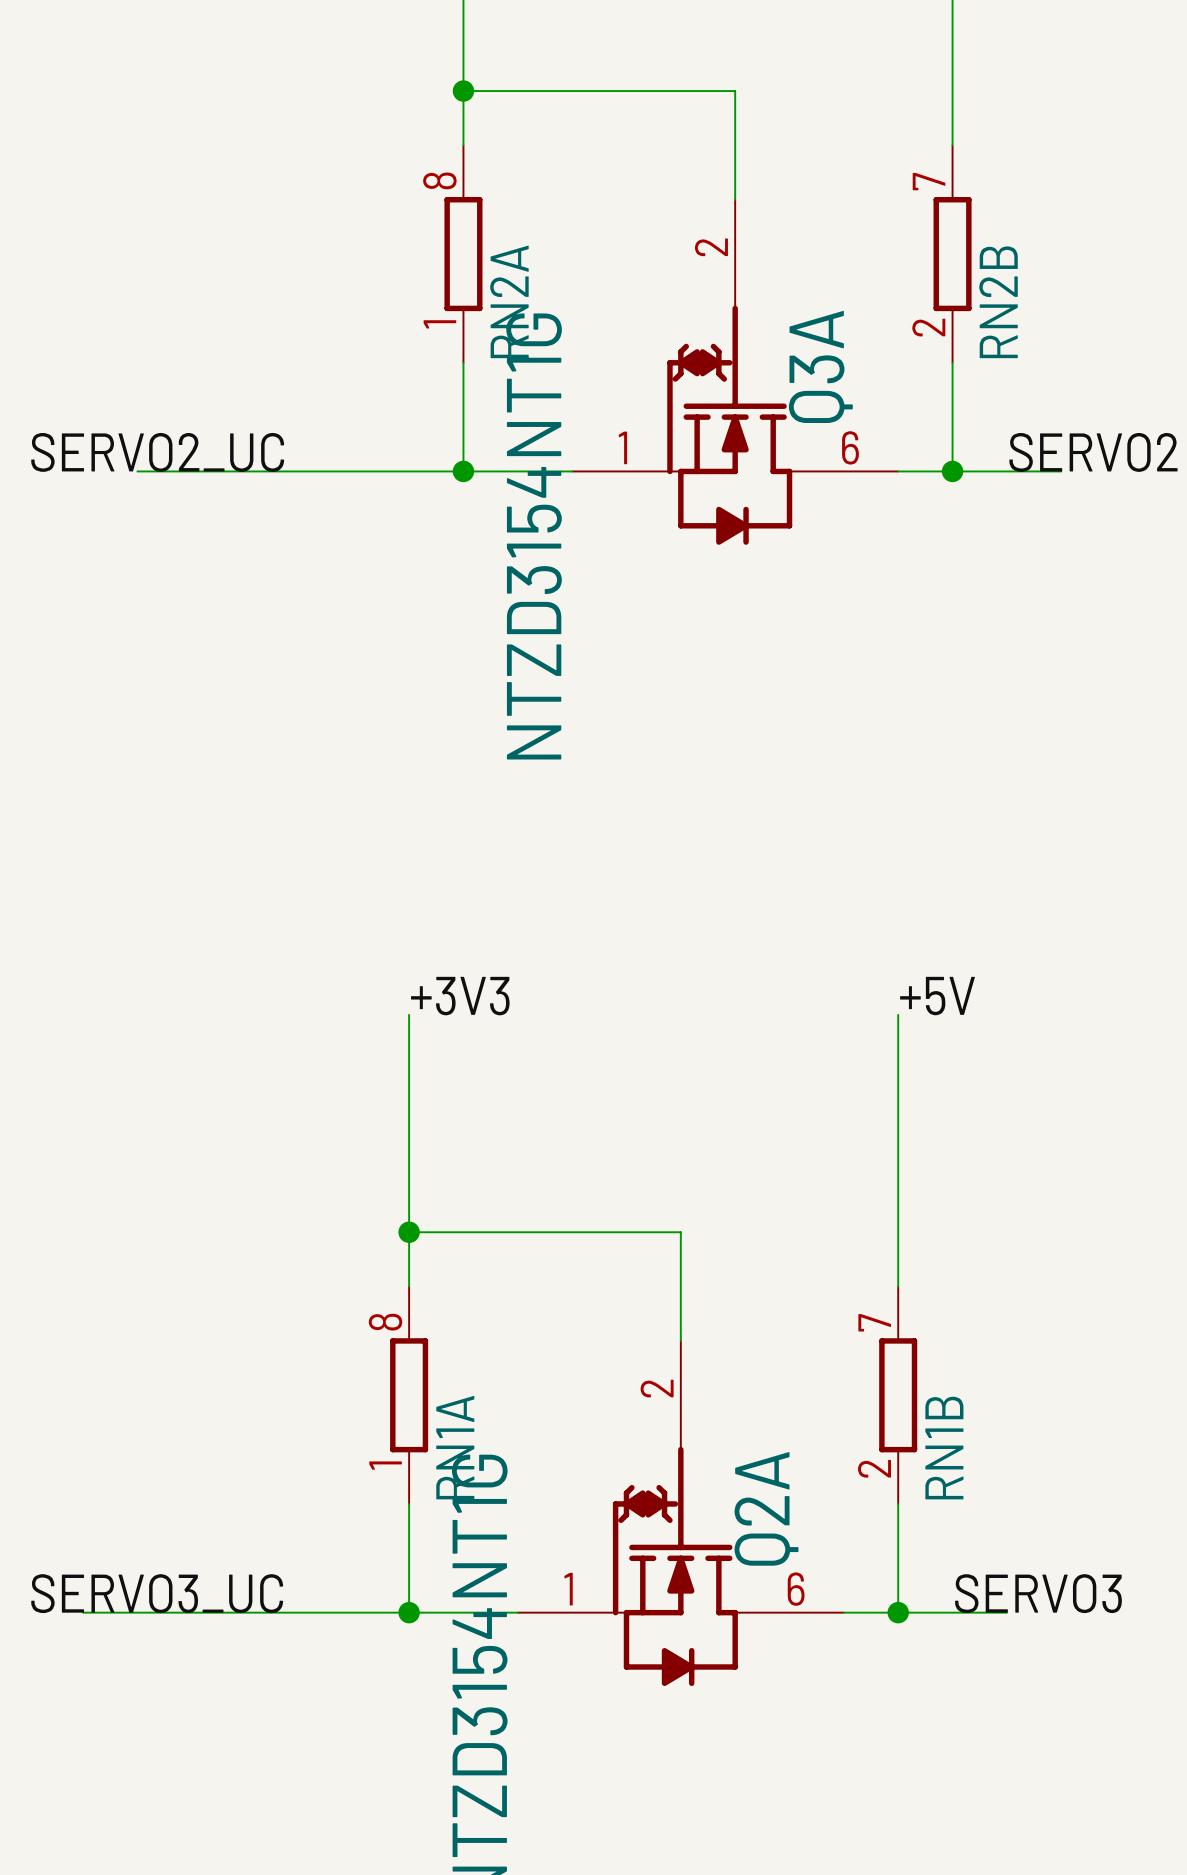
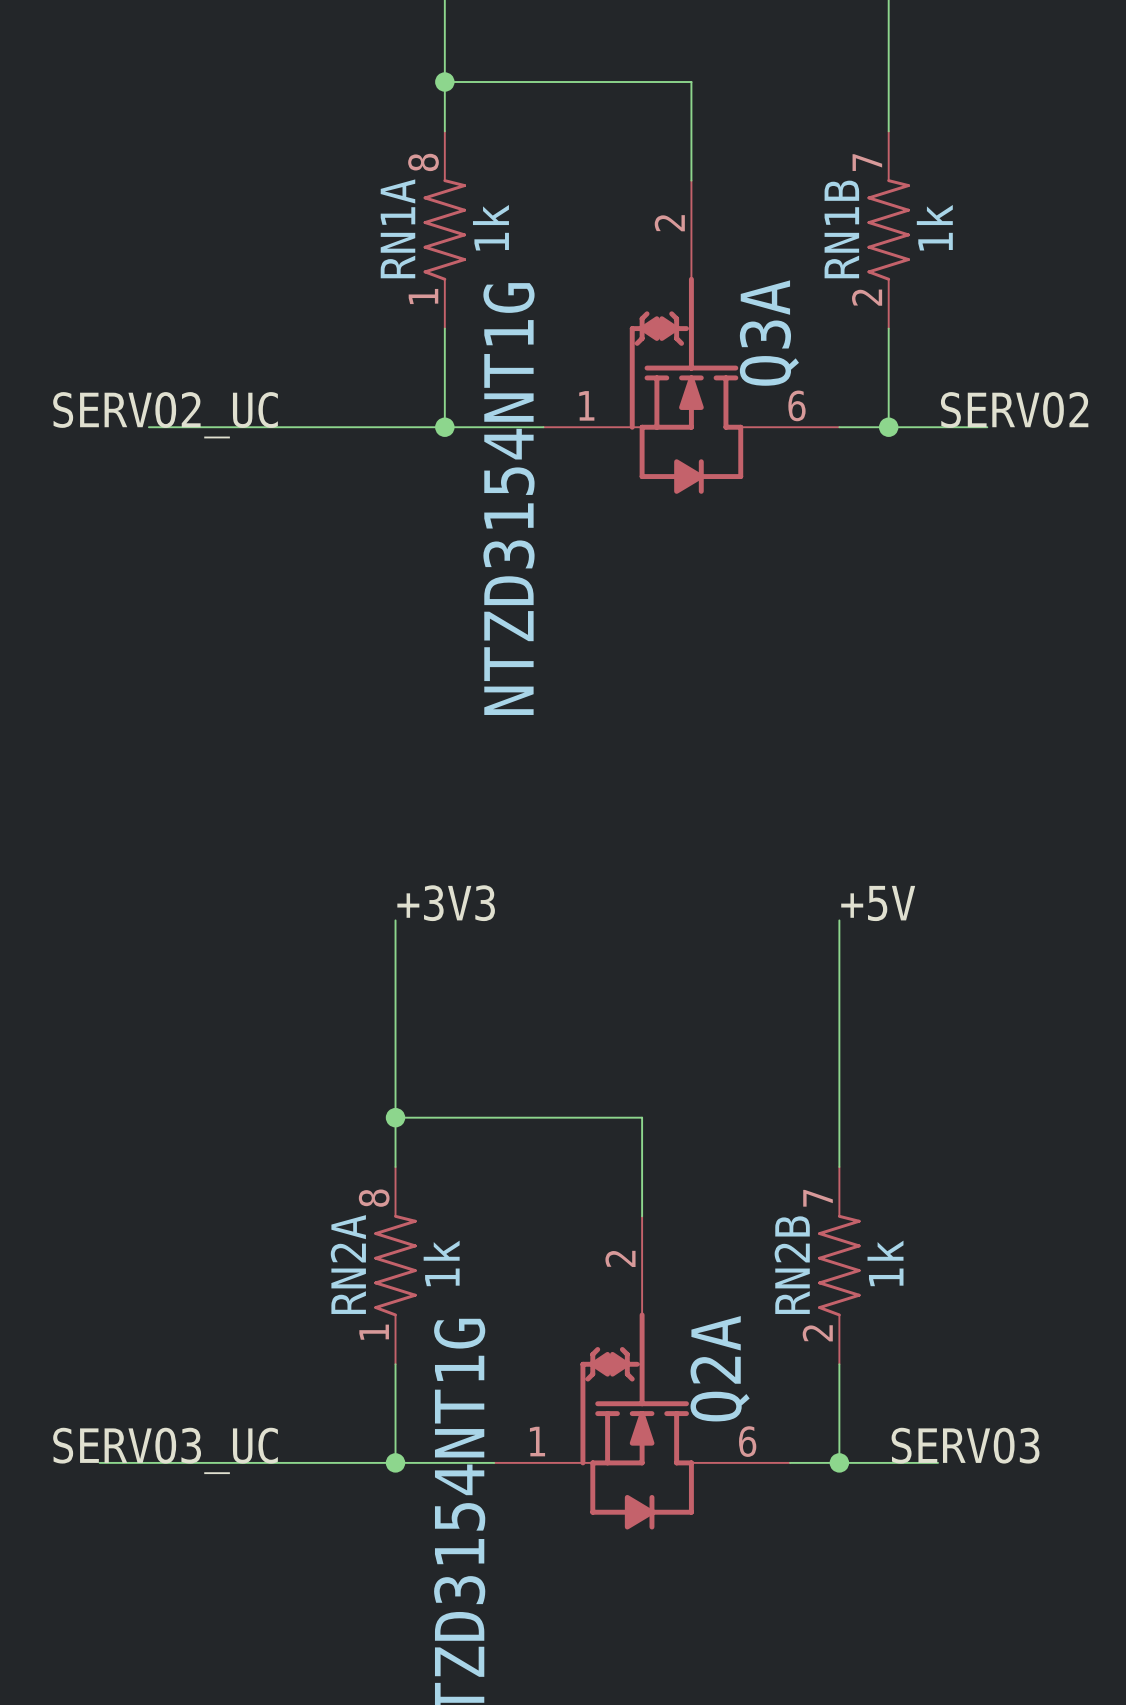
RN2A symbol: [444, 145, 483, 363] -> [374, 1167, 417, 1365]
RN2B symbol: [933, 145, 972, 363] -> [818, 1167, 861, 1365]
RN1A value: none -> 1k (490, 227)
RN1B value: none -> 1k (934, 227)
RN2A name position: RN2A (509, 301) -> RN2A (348, 1264)
RN2B name position: RN2B (998, 302) -> RN2B (792, 1265)
RN1A symbol: [390, 1286, 429, 1504] -> [423, 131, 467, 329]
RN1B symbol: [879, 1286, 918, 1504] -> [867, 131, 910, 329]
RN2A value: none -> 1k (441, 1263)
RN2B value: none -> 1k (885, 1263)
RN1A name position: RN1A (455, 1447) -> RN1A (397, 228)
RN1B name position: RN1B (944, 1448) -> RN1B (841, 229)

